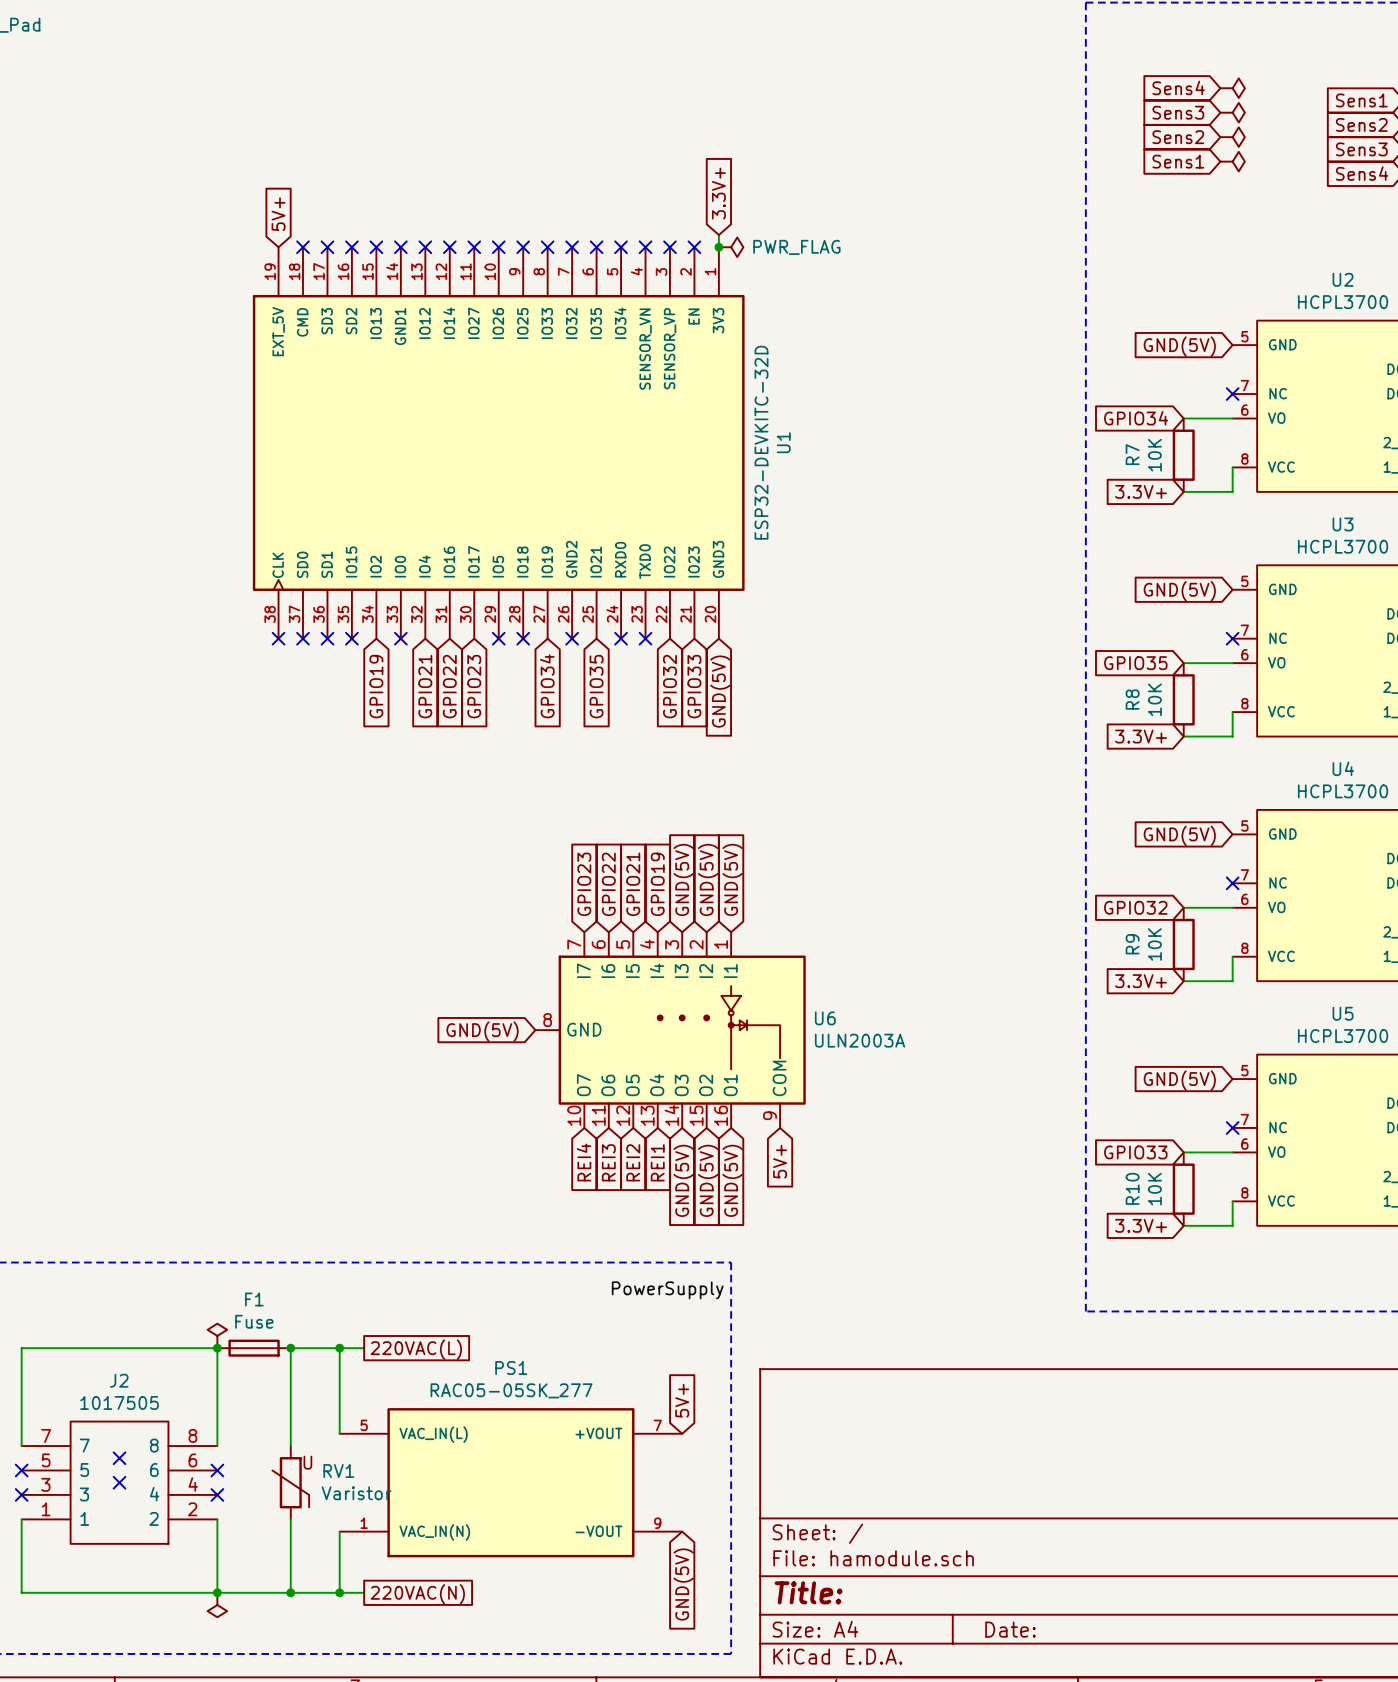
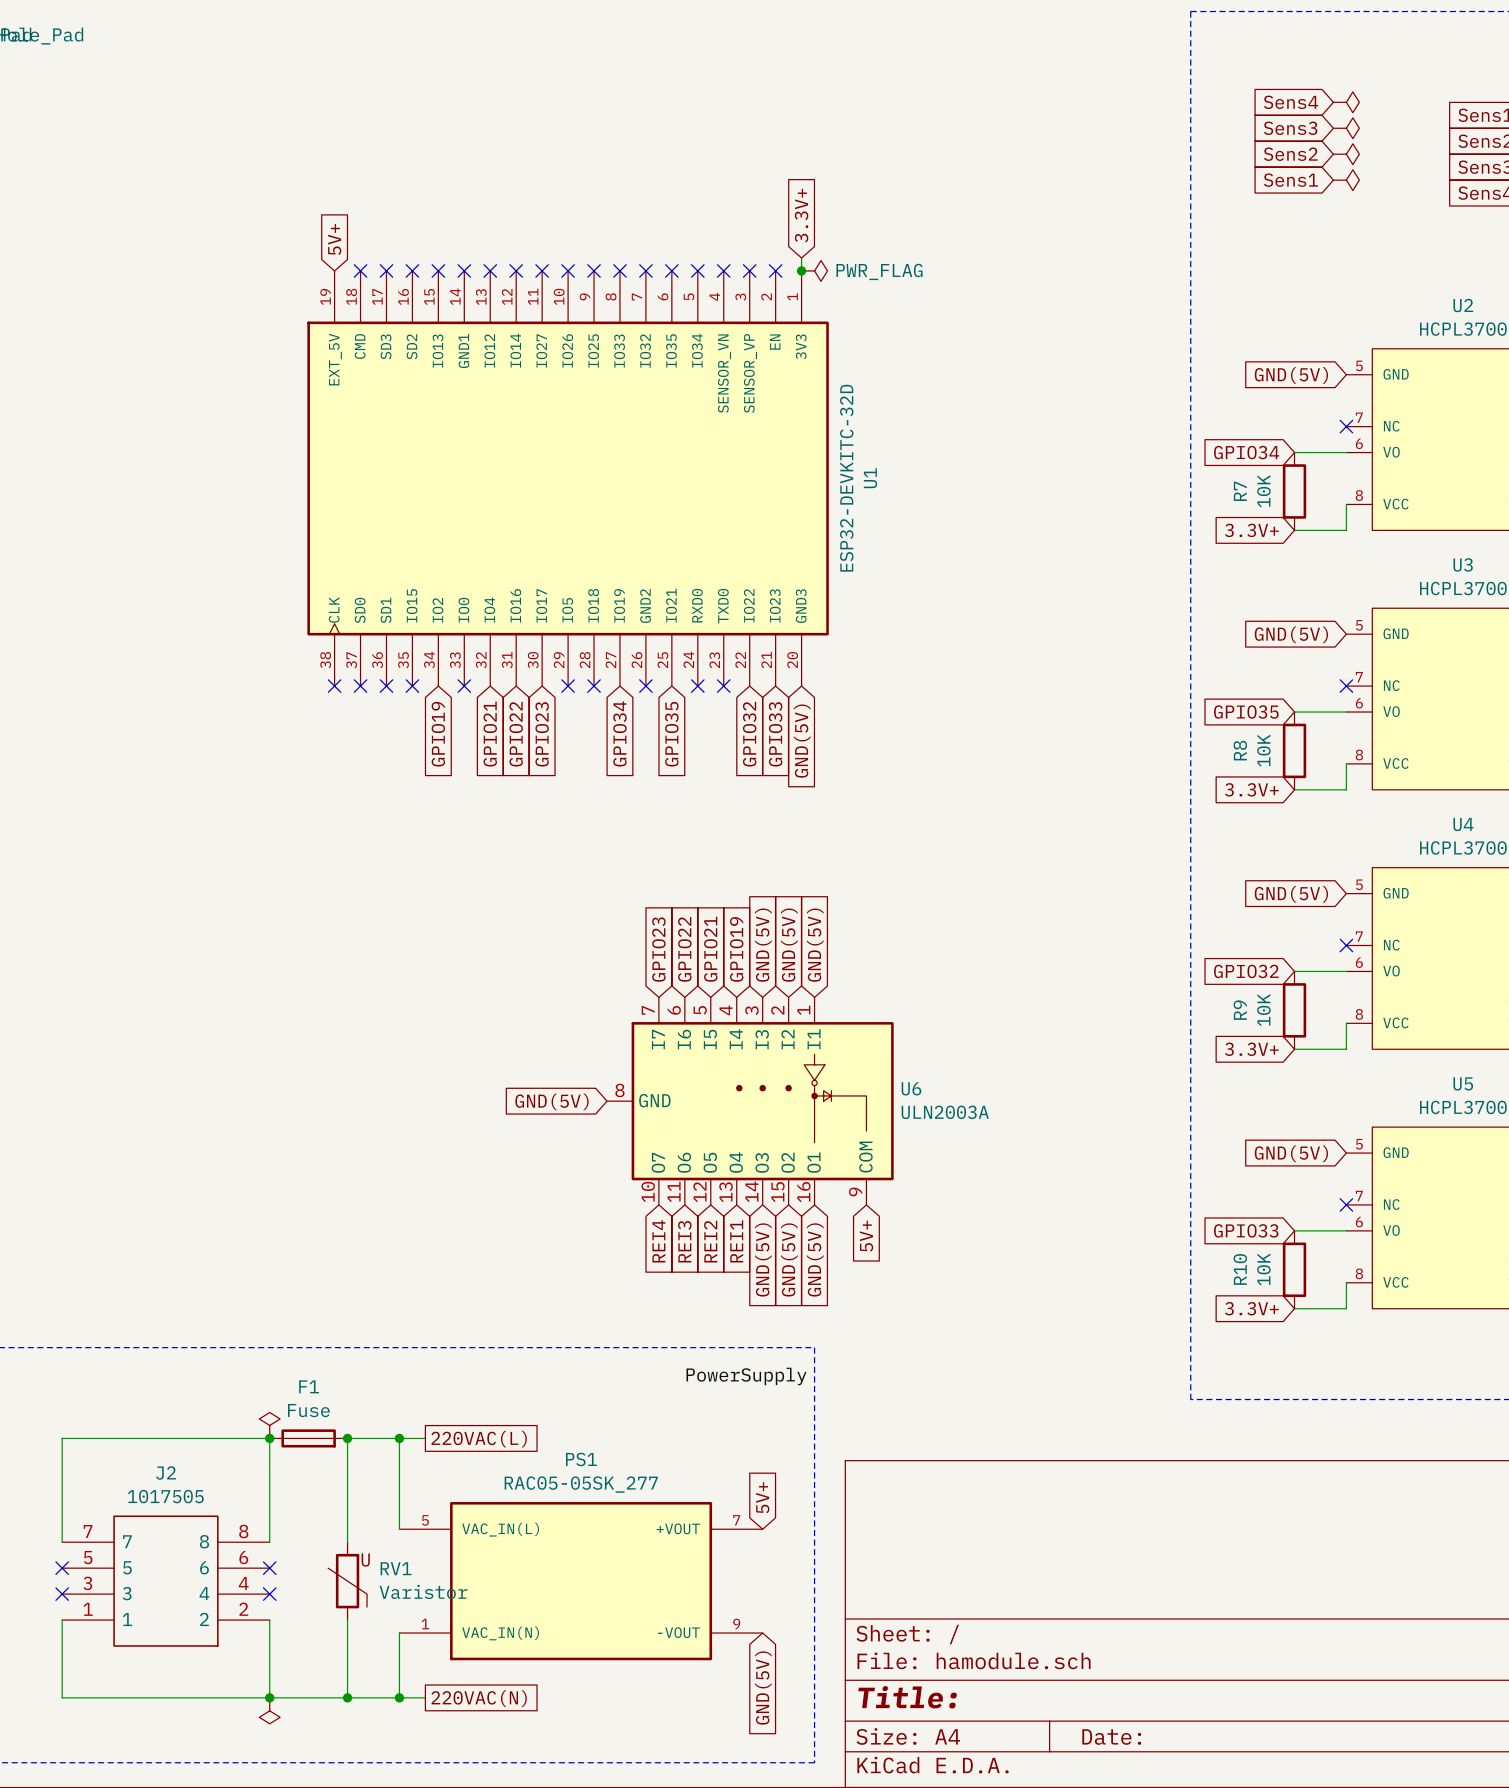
no-connect mark: (119, 1458) -> none
no-connect mark: (119, 1482) -> none

